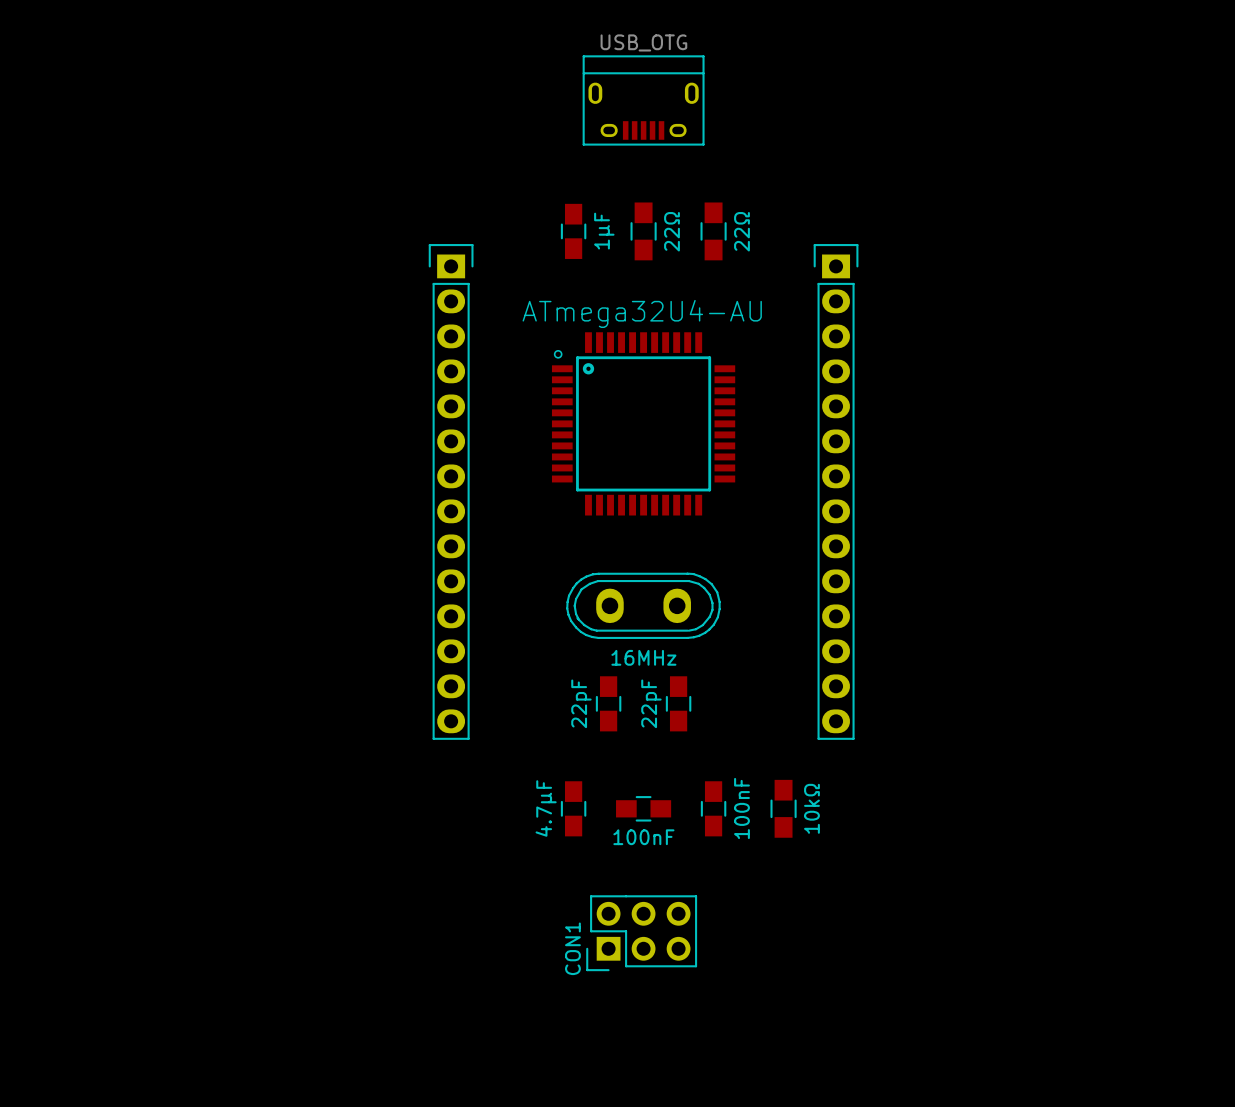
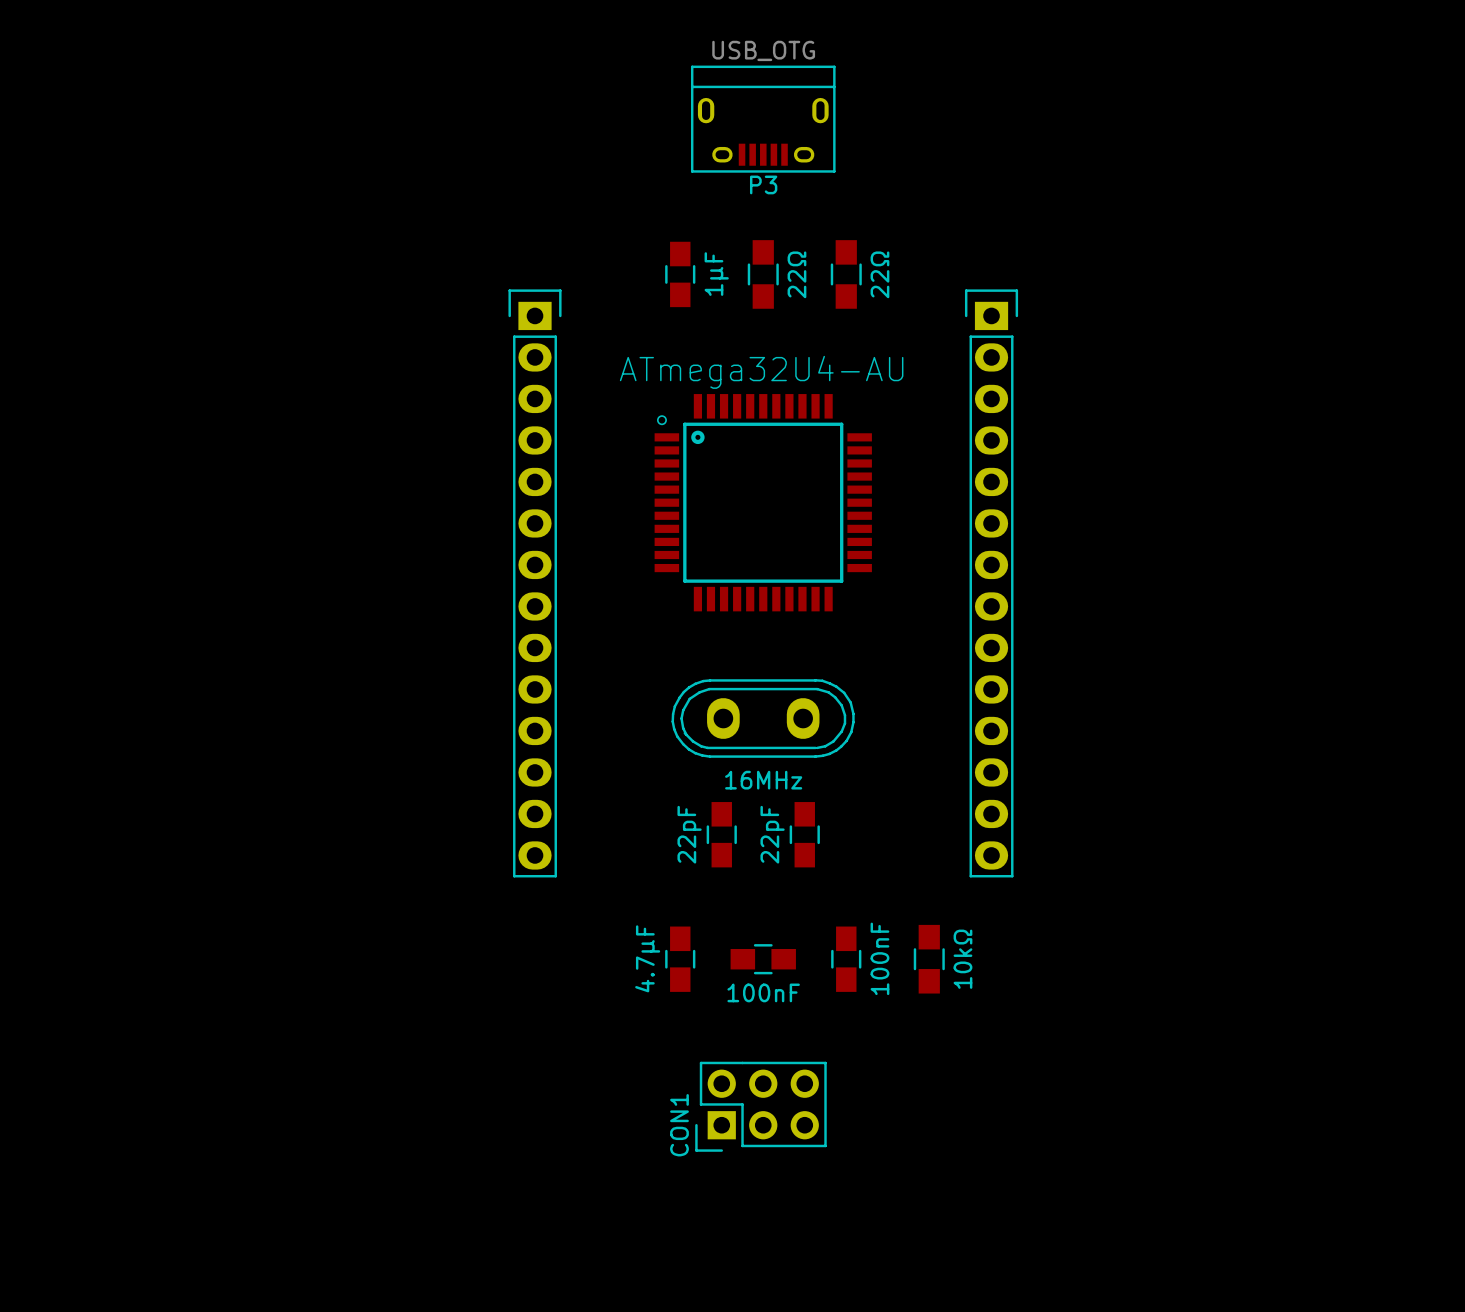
P3 name: none -> P3 (763, 184)

